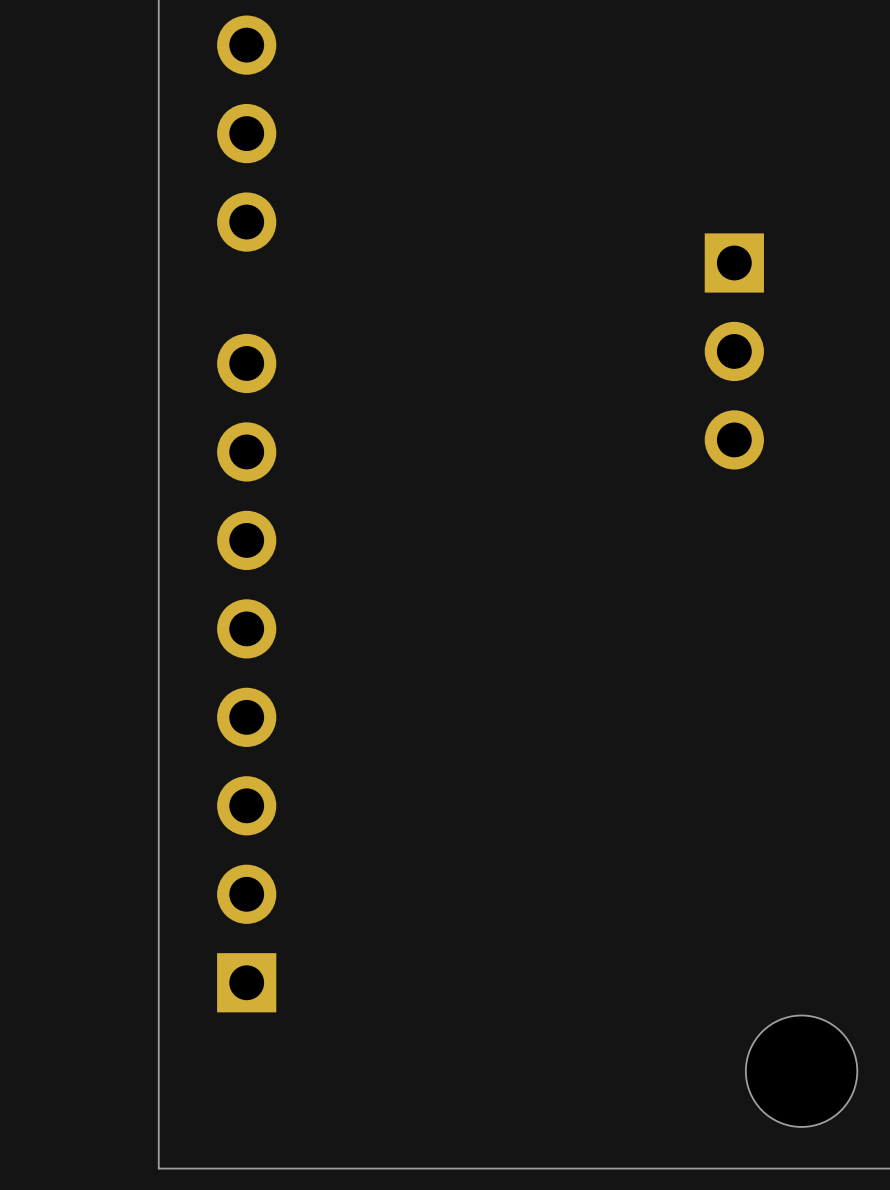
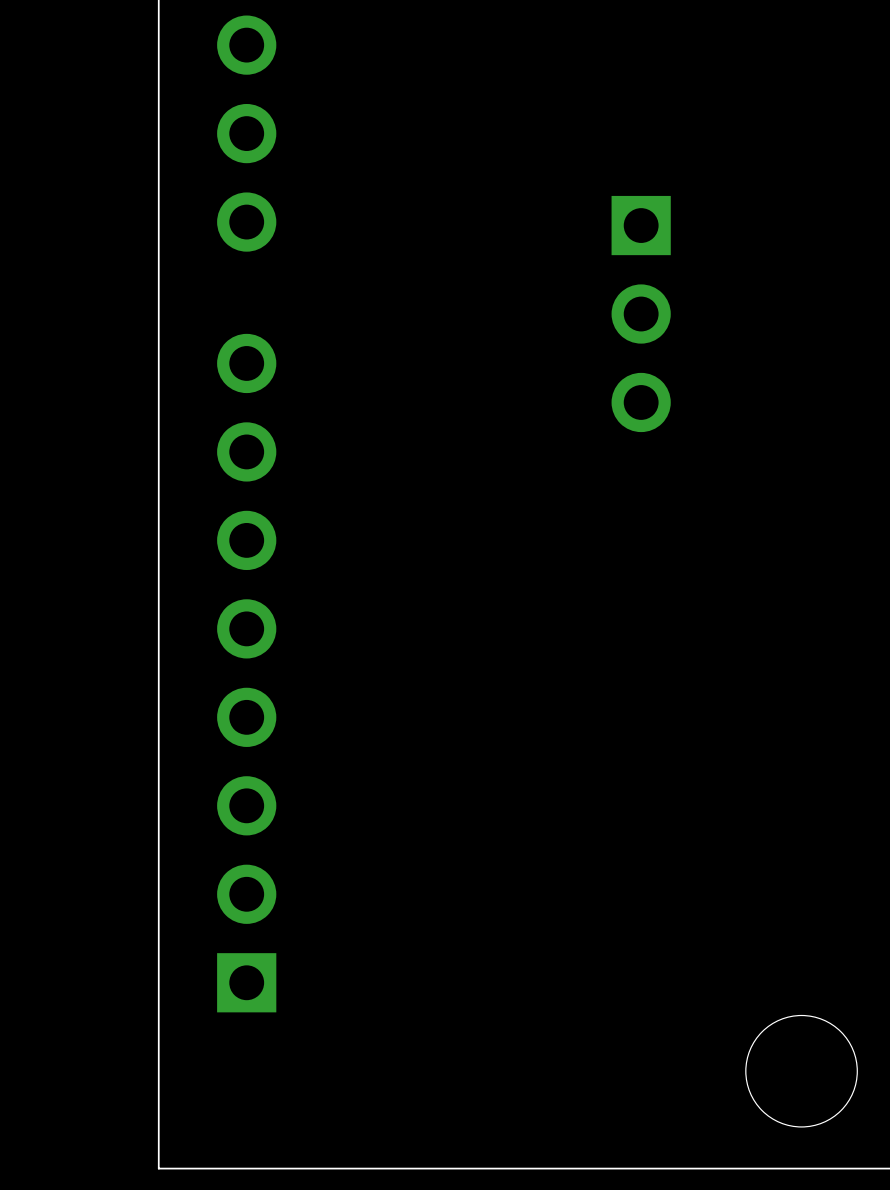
part position: (734, 351) -> (641, 314)

